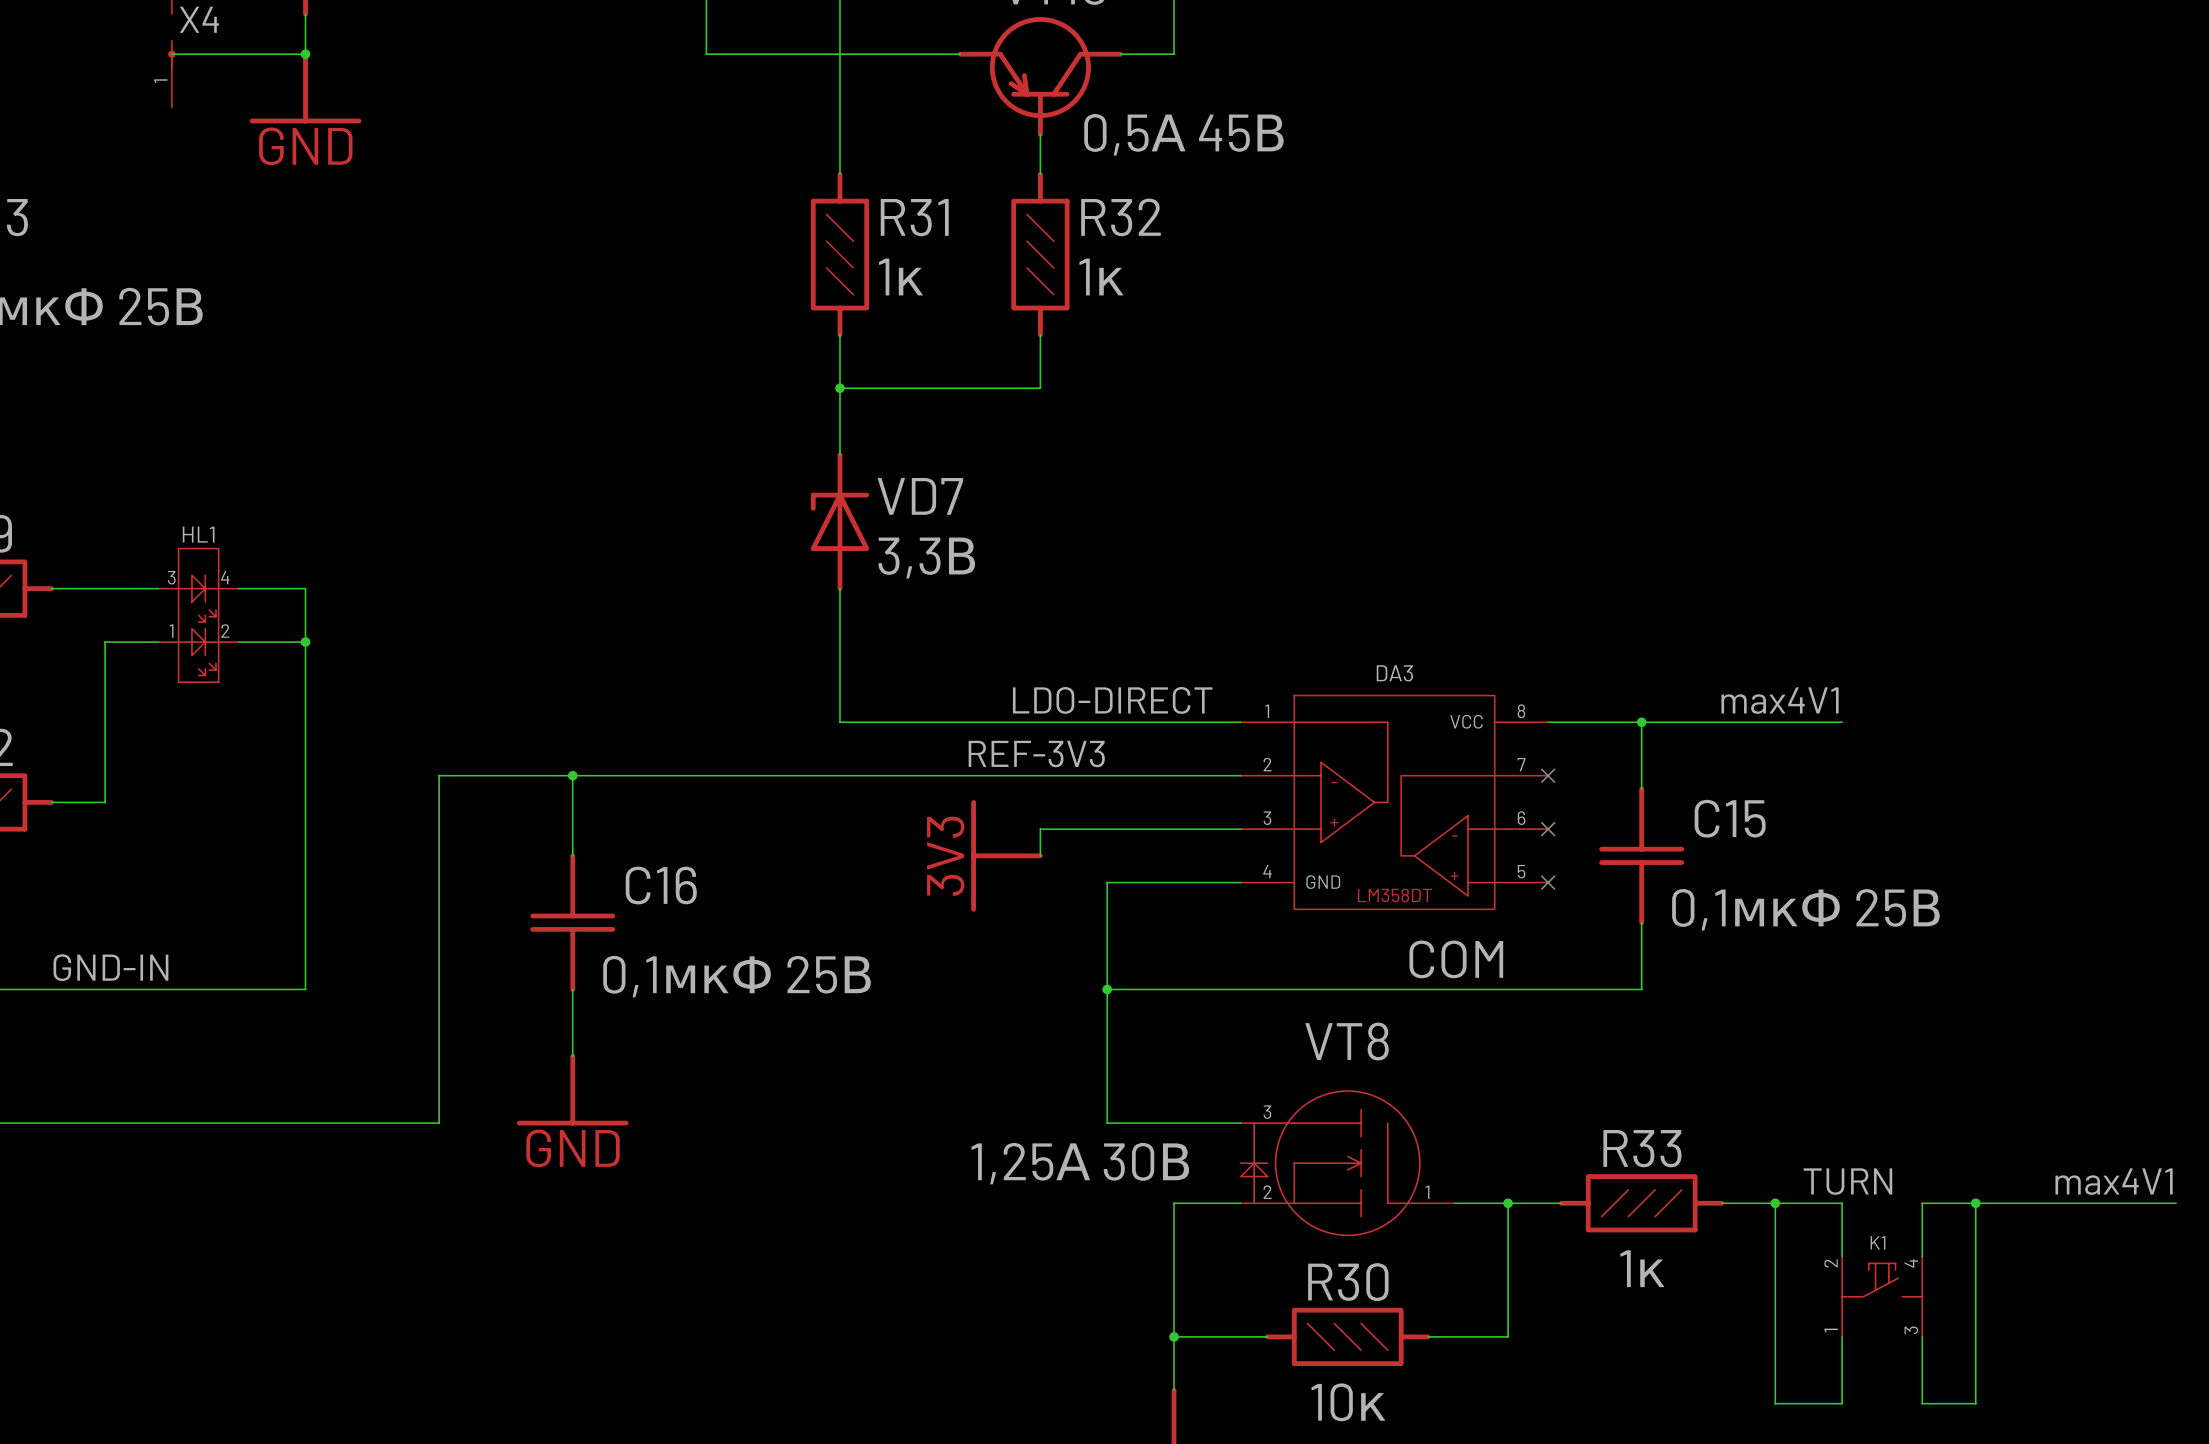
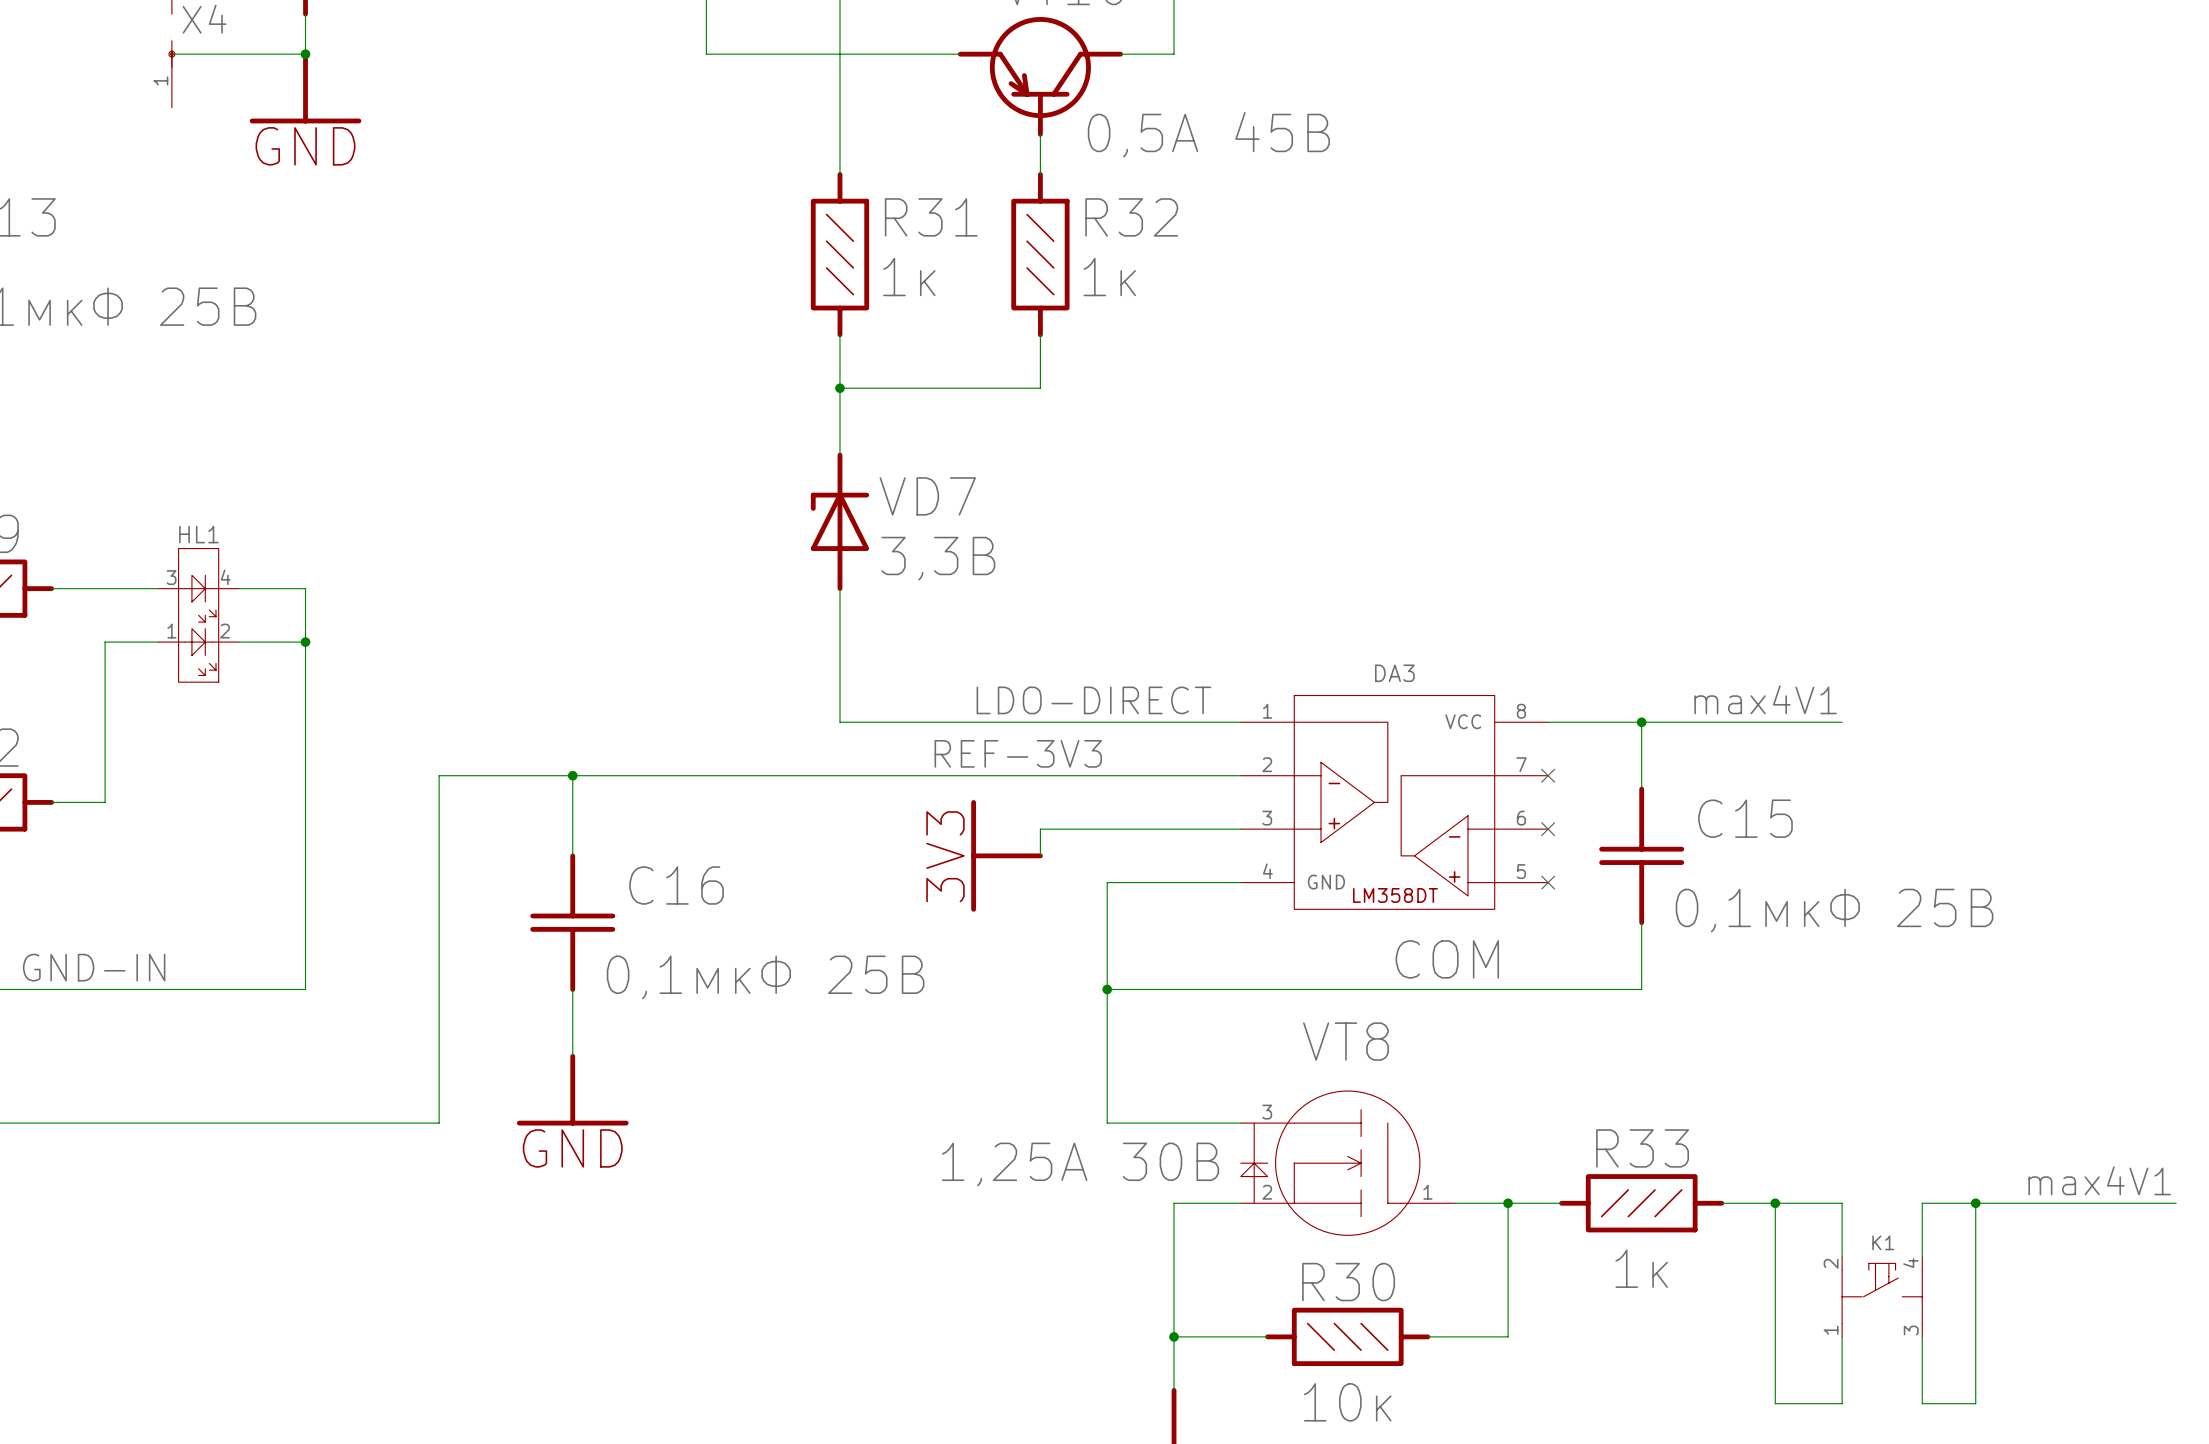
label: TURN (1847, 1181) -> none

